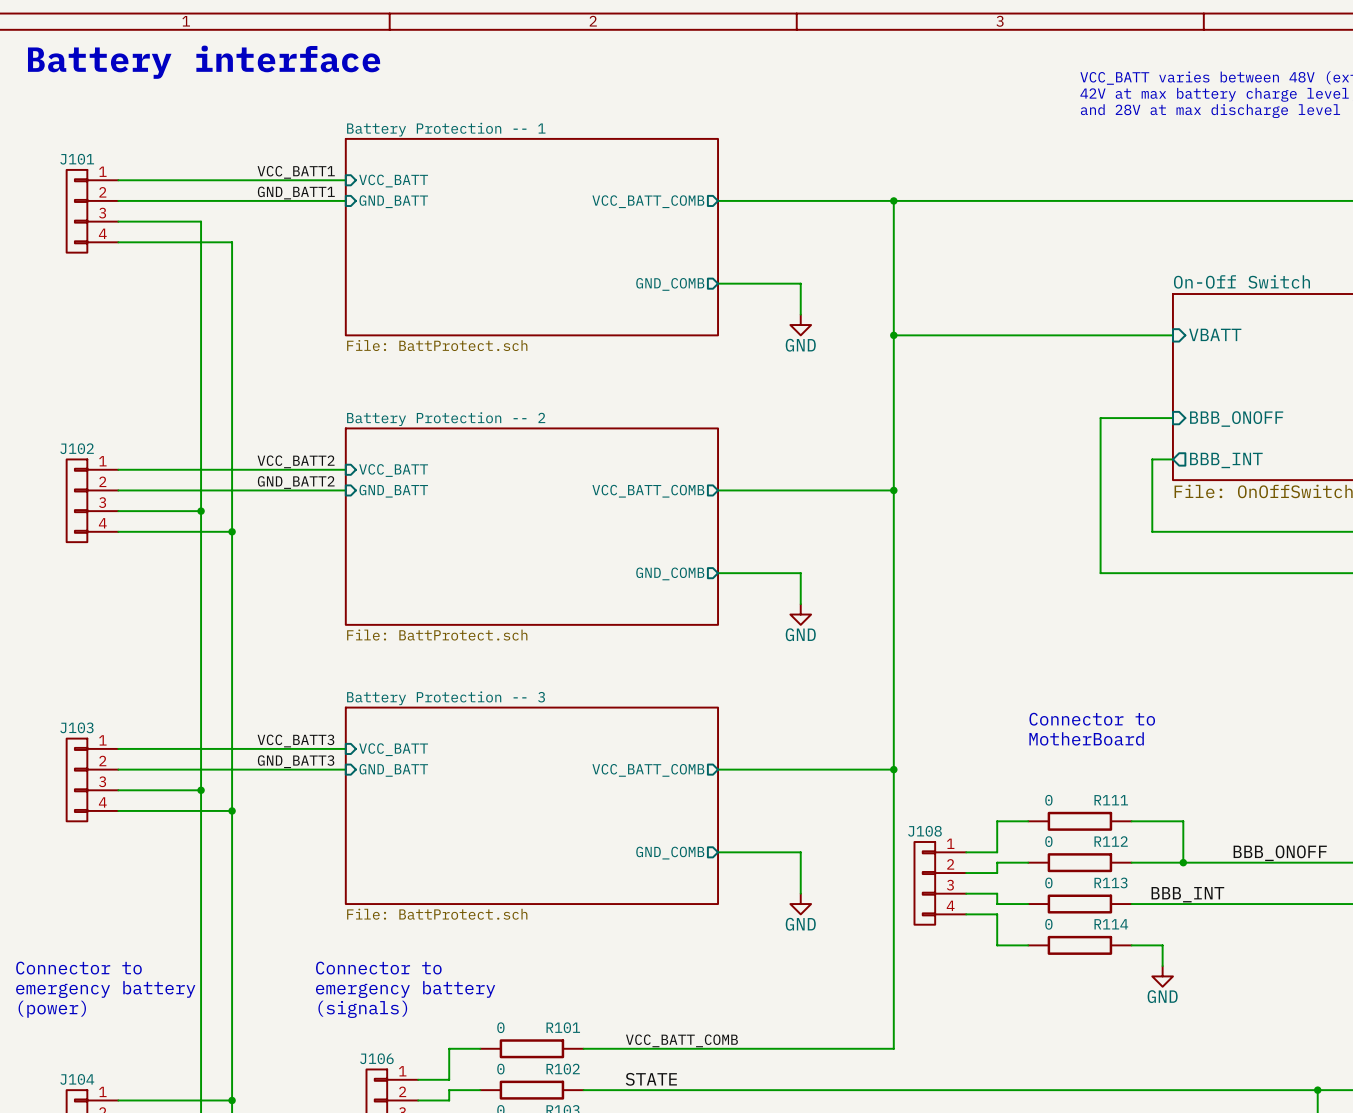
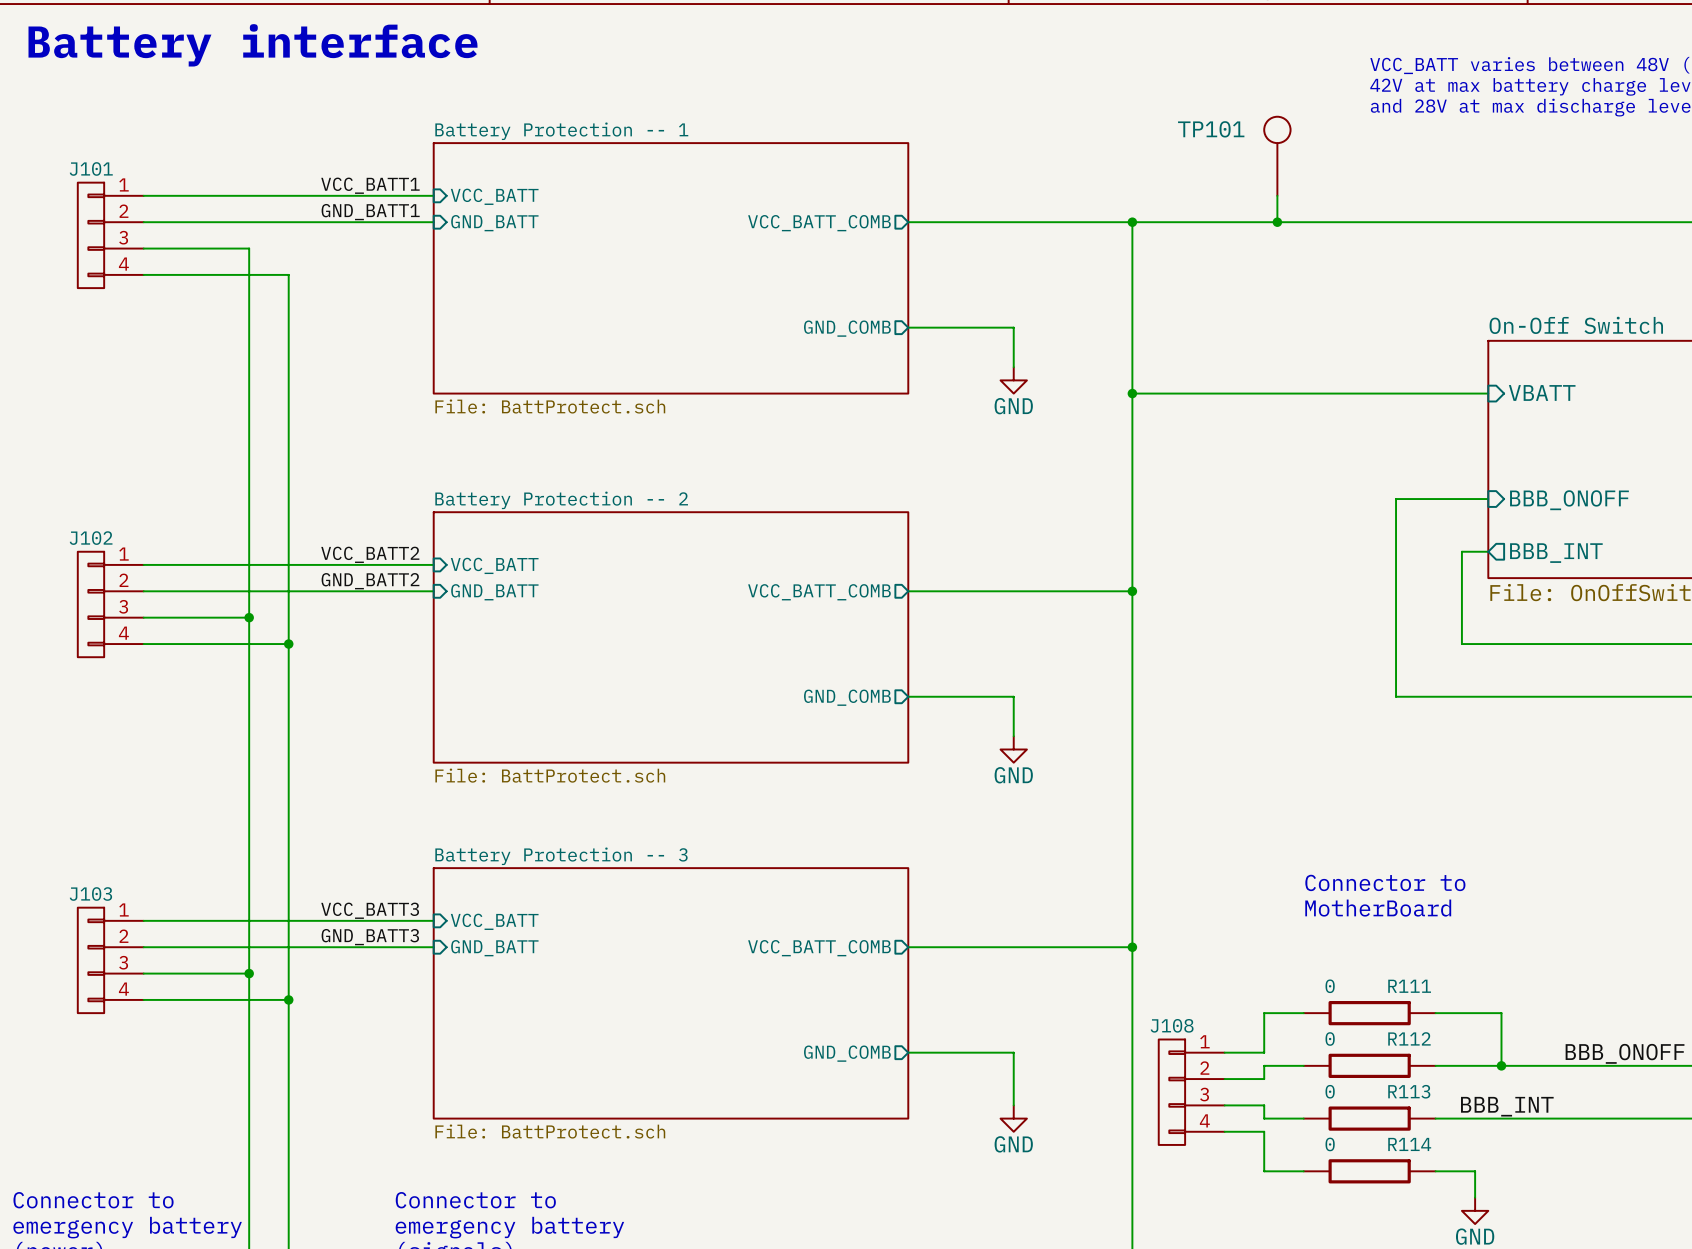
TP101: none -> (1277, 156)
wire: none -> (1277, 195) (1277, 222)
junction: none -> (1277, 222)

